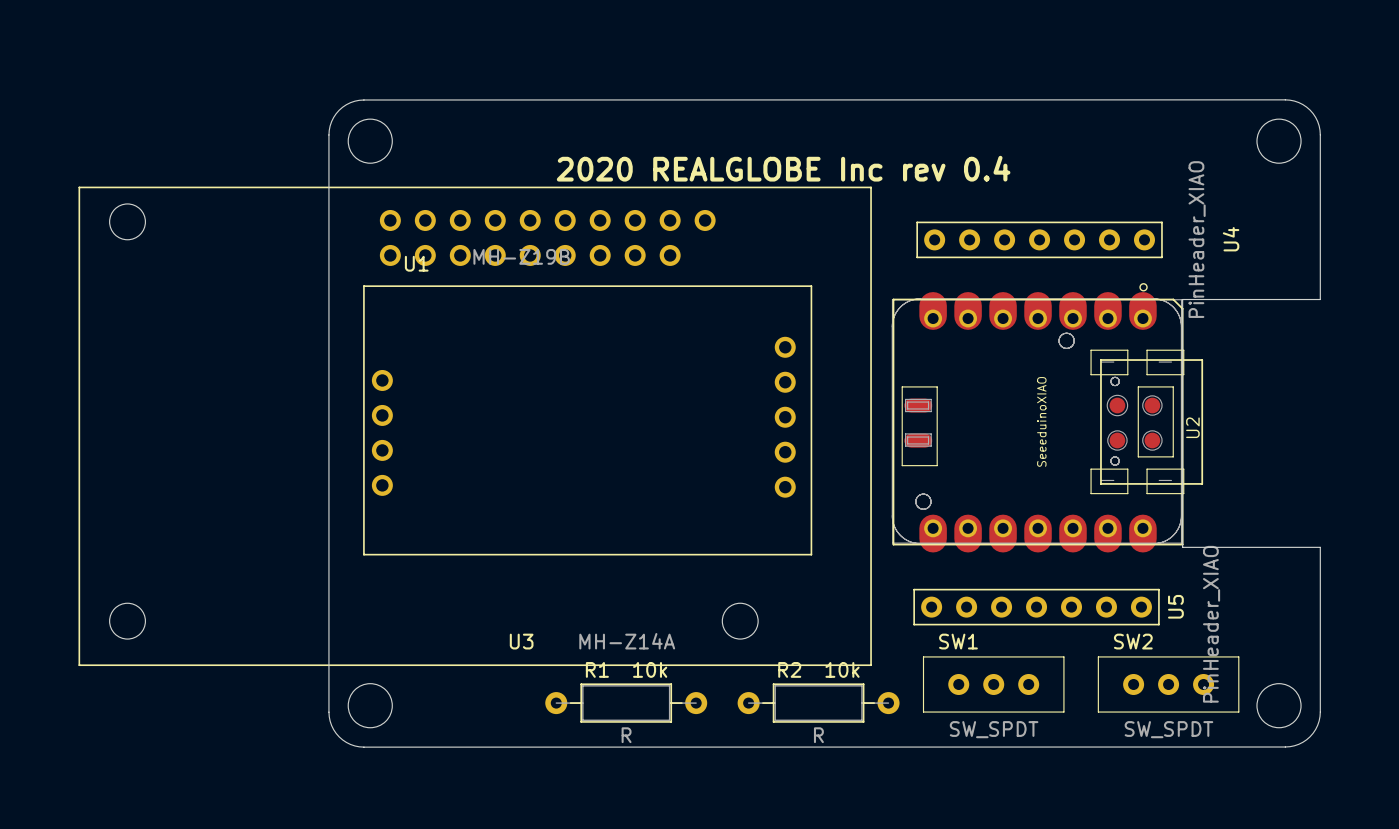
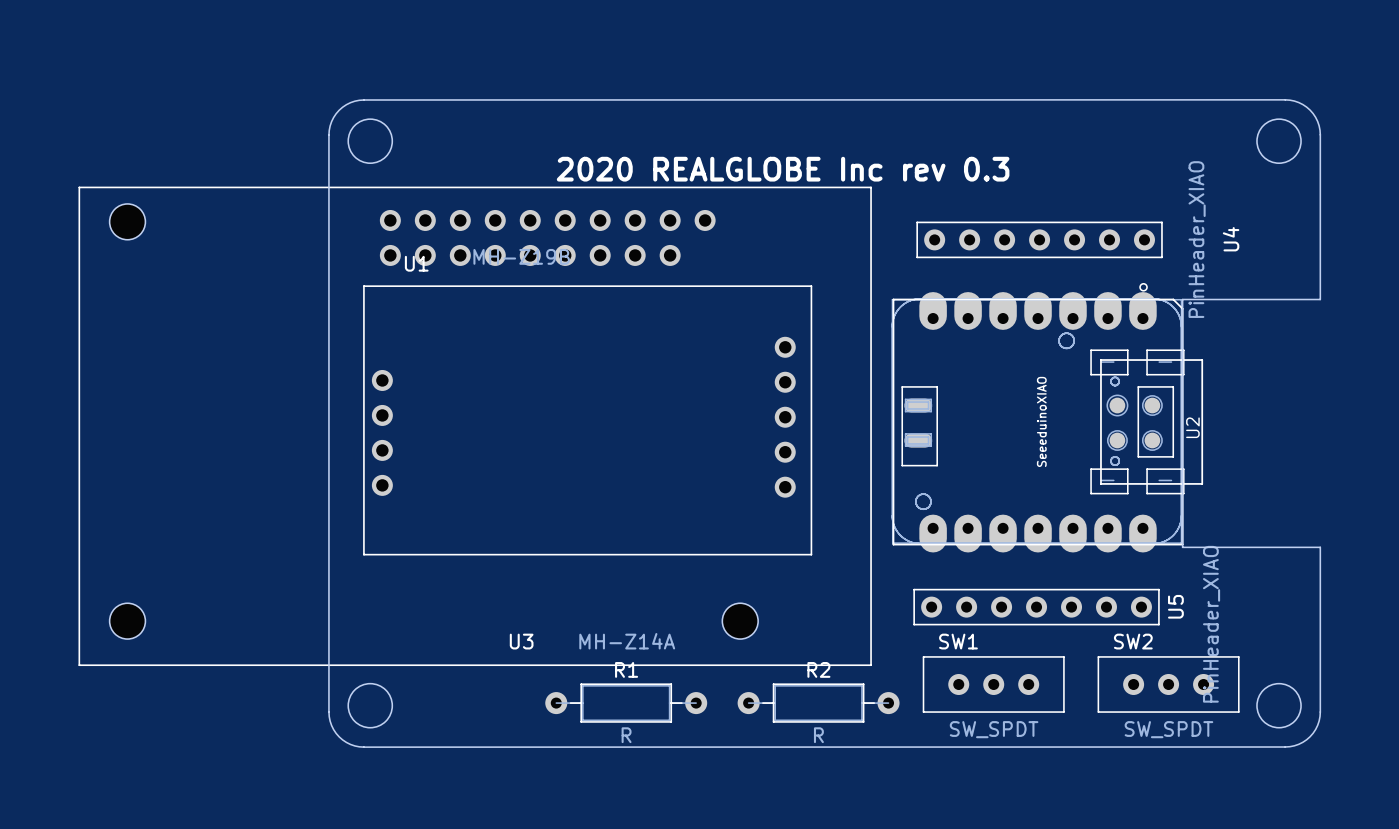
text: 2020 REALGLOBE Inc rev 0.4 (783, 168) -> 2020 REALGLOBE Inc rev 0.3 (783, 169)
R1 10k name: R1 10k (626, 669) -> R1 (626, 669)
R2 10k name: R2 10k (818, 669) -> R2 (818, 669)

